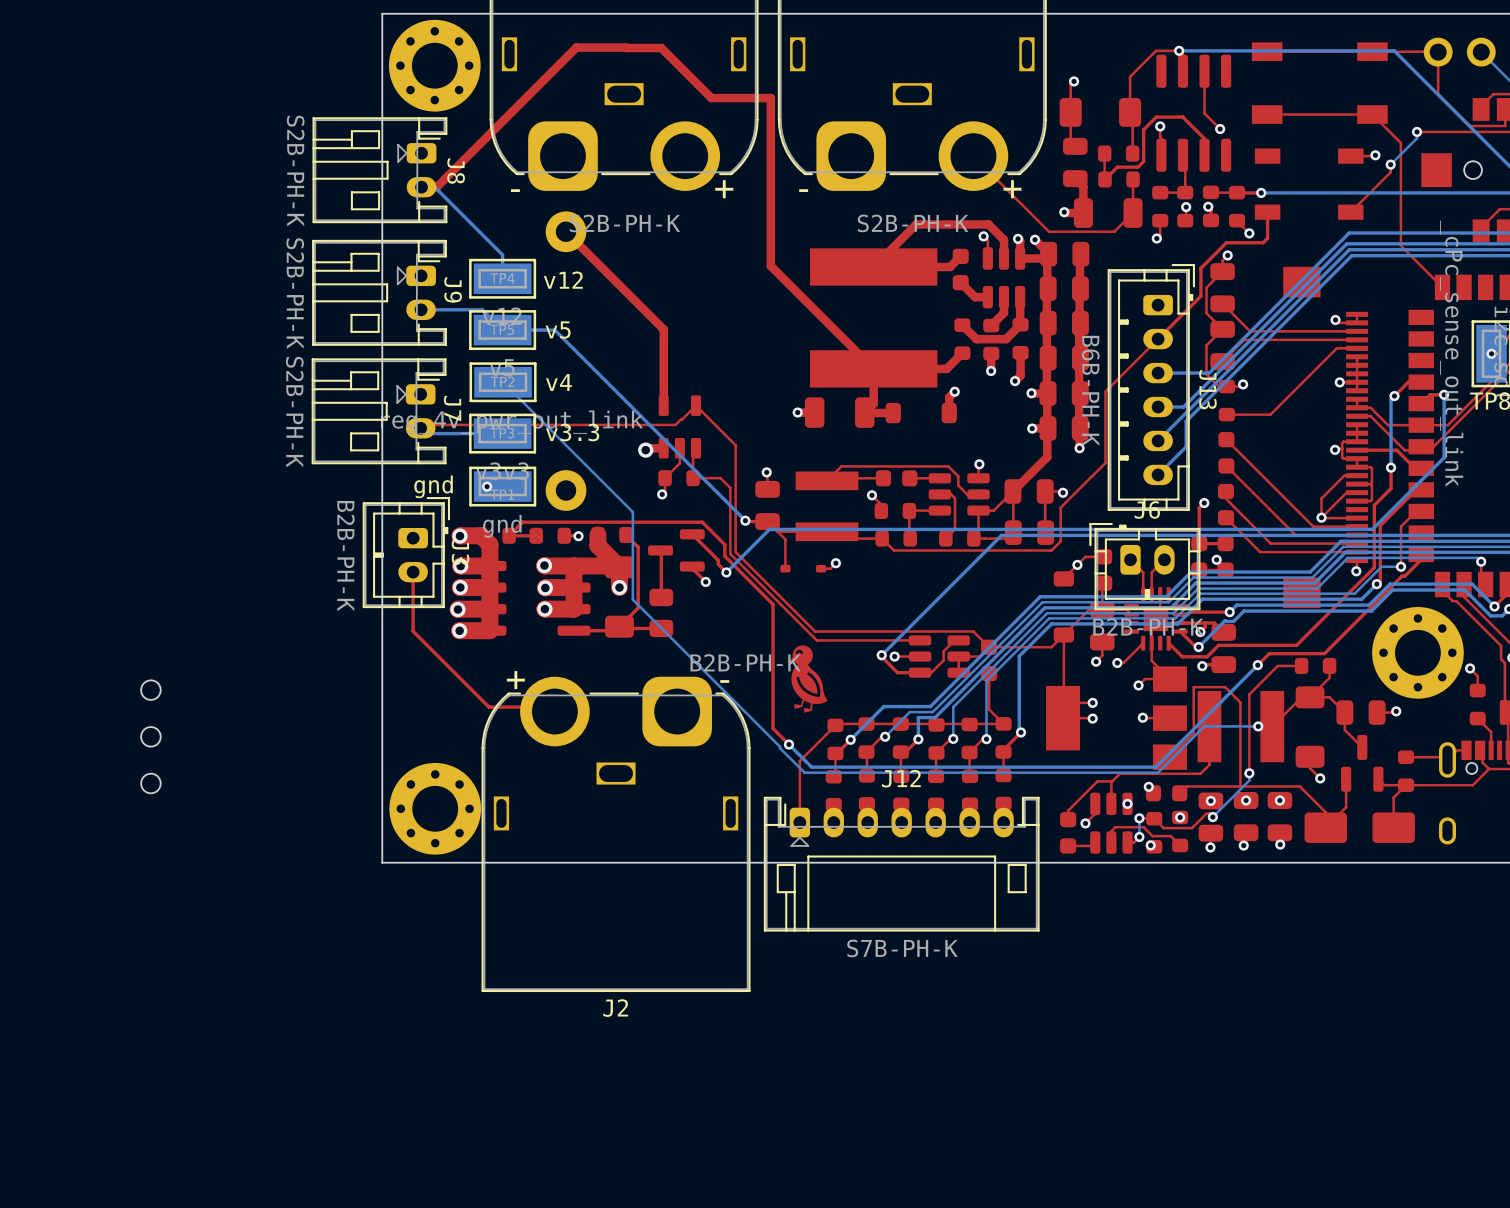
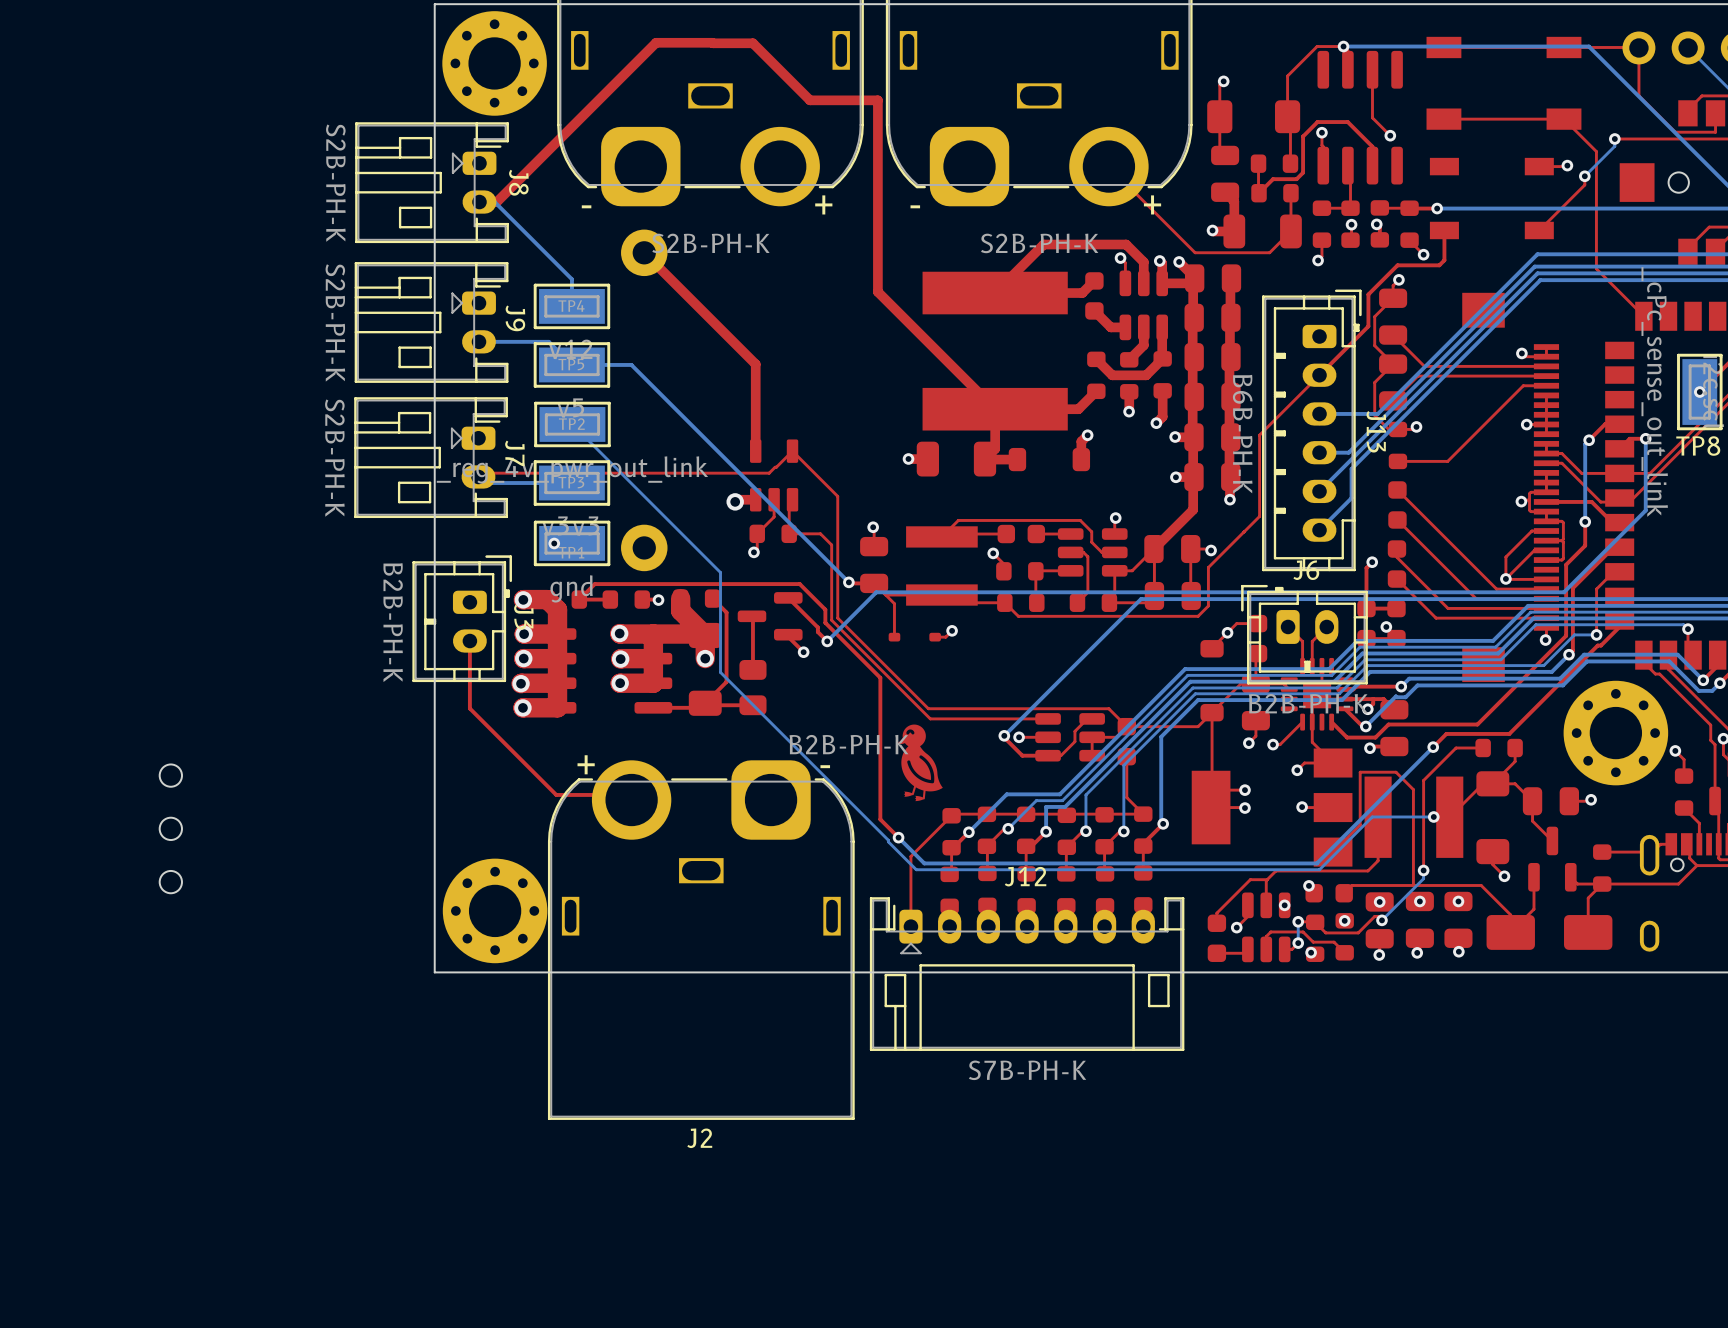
text: v12 (563, 280) -> none
text: v5 (558, 330) -> none
text: v4 (558, 382) -> none
text: v3.3 (572, 432) -> none
text: gnd (433, 486) -> none

